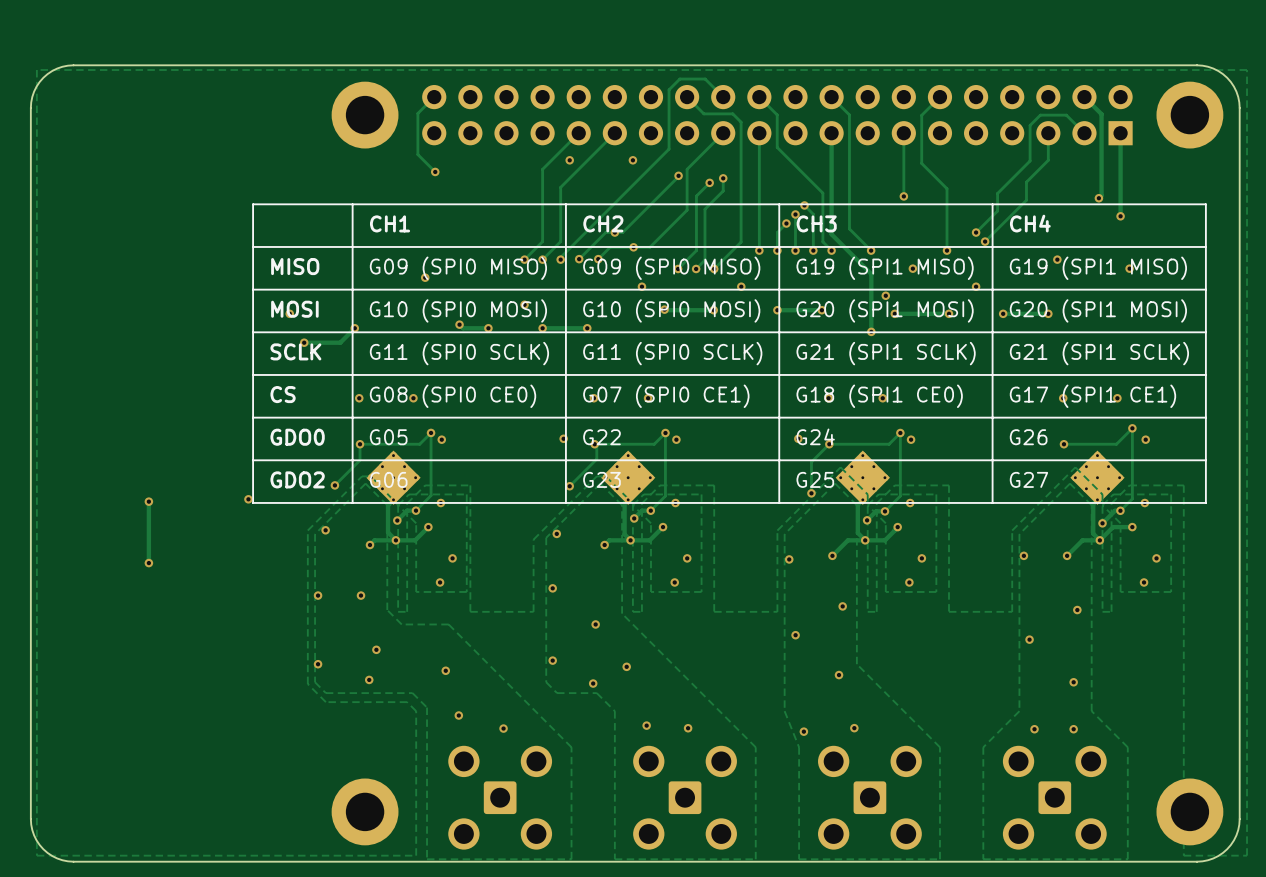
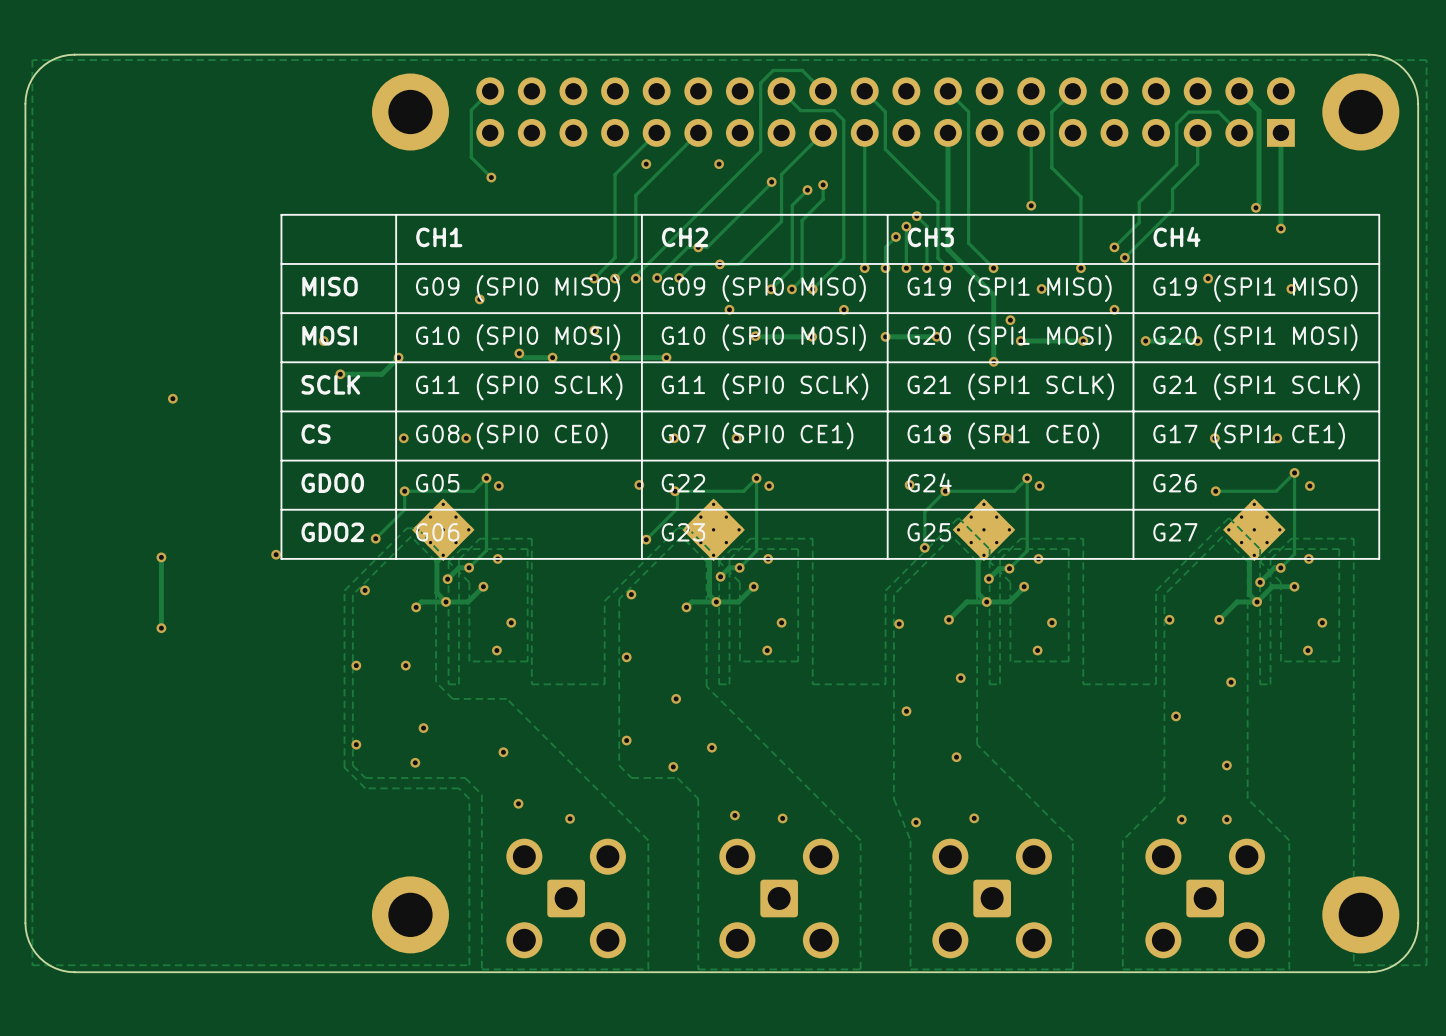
via: none -> (172, 398)

